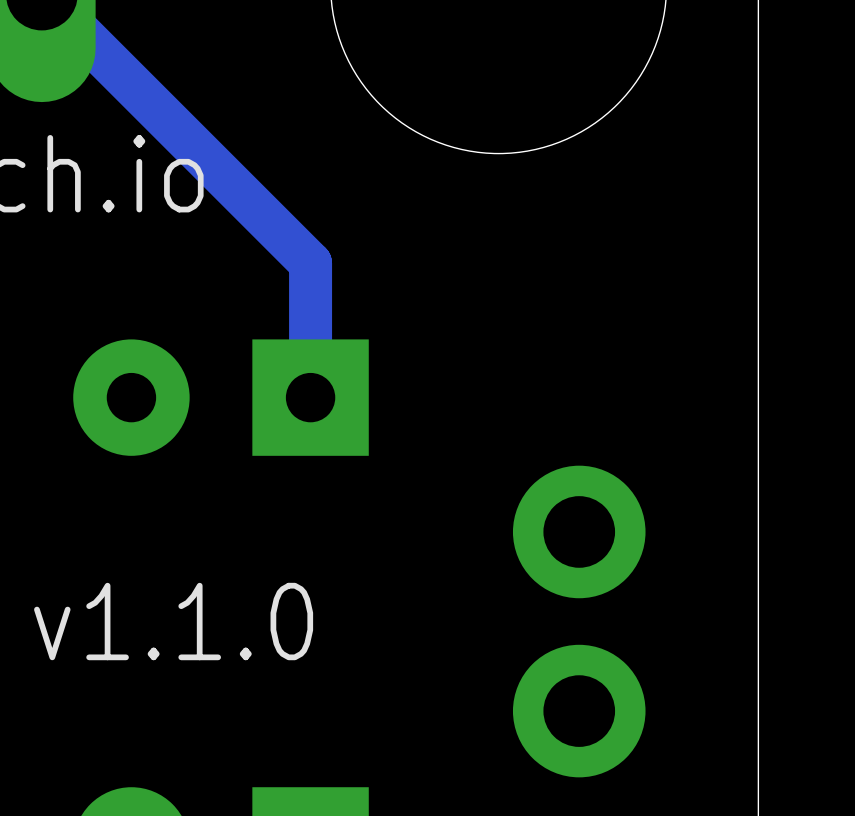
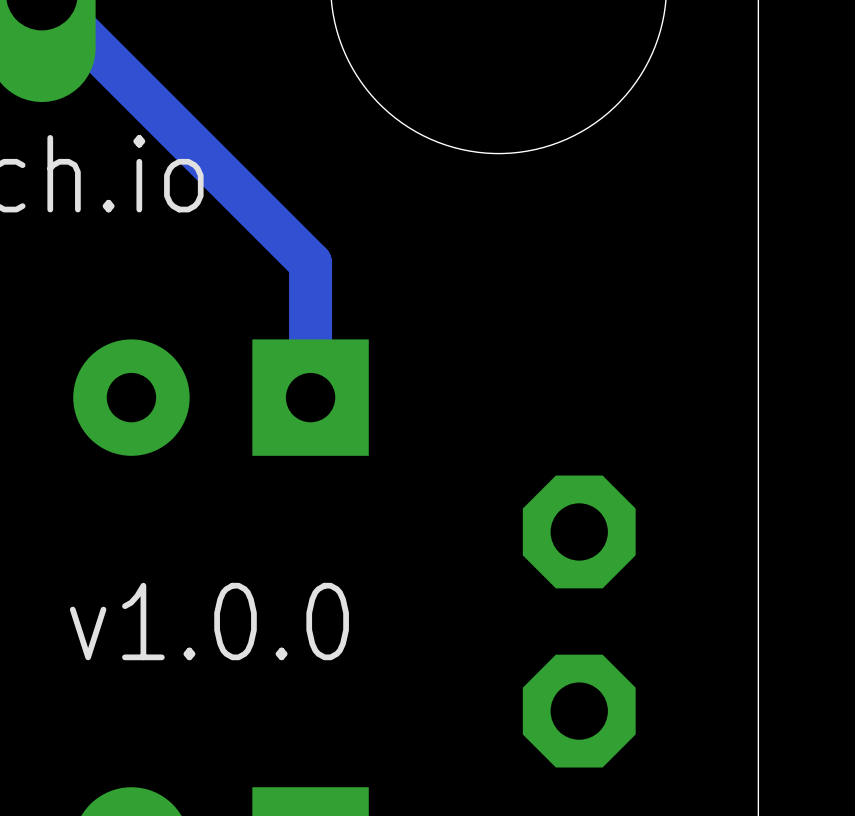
part: none -> (579, 531)
text: v1.1.0 (173, 621) -> v1.0.0 (209, 621)
part: (579, 621) -> none
part: none -> (579, 711)

